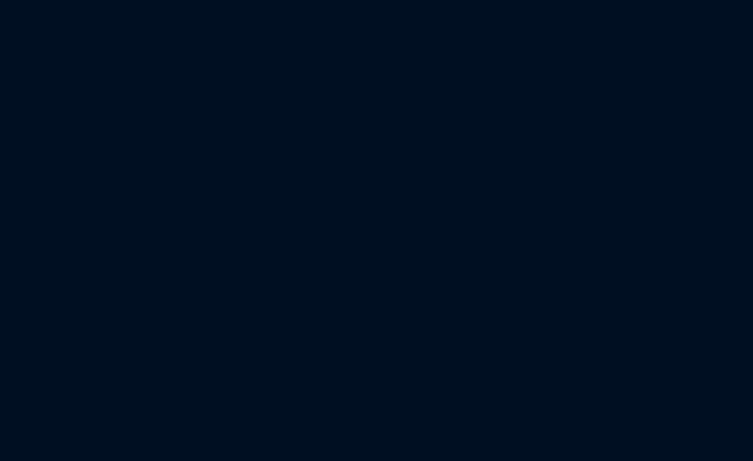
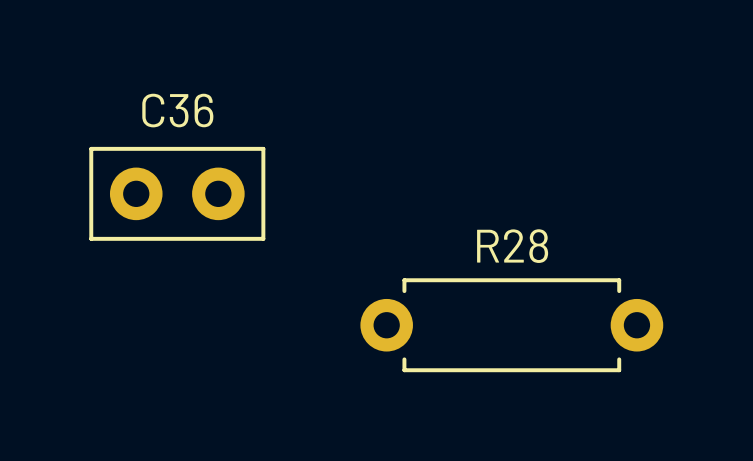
C36: none -> (177, 193)
R28: none -> (511, 325)

